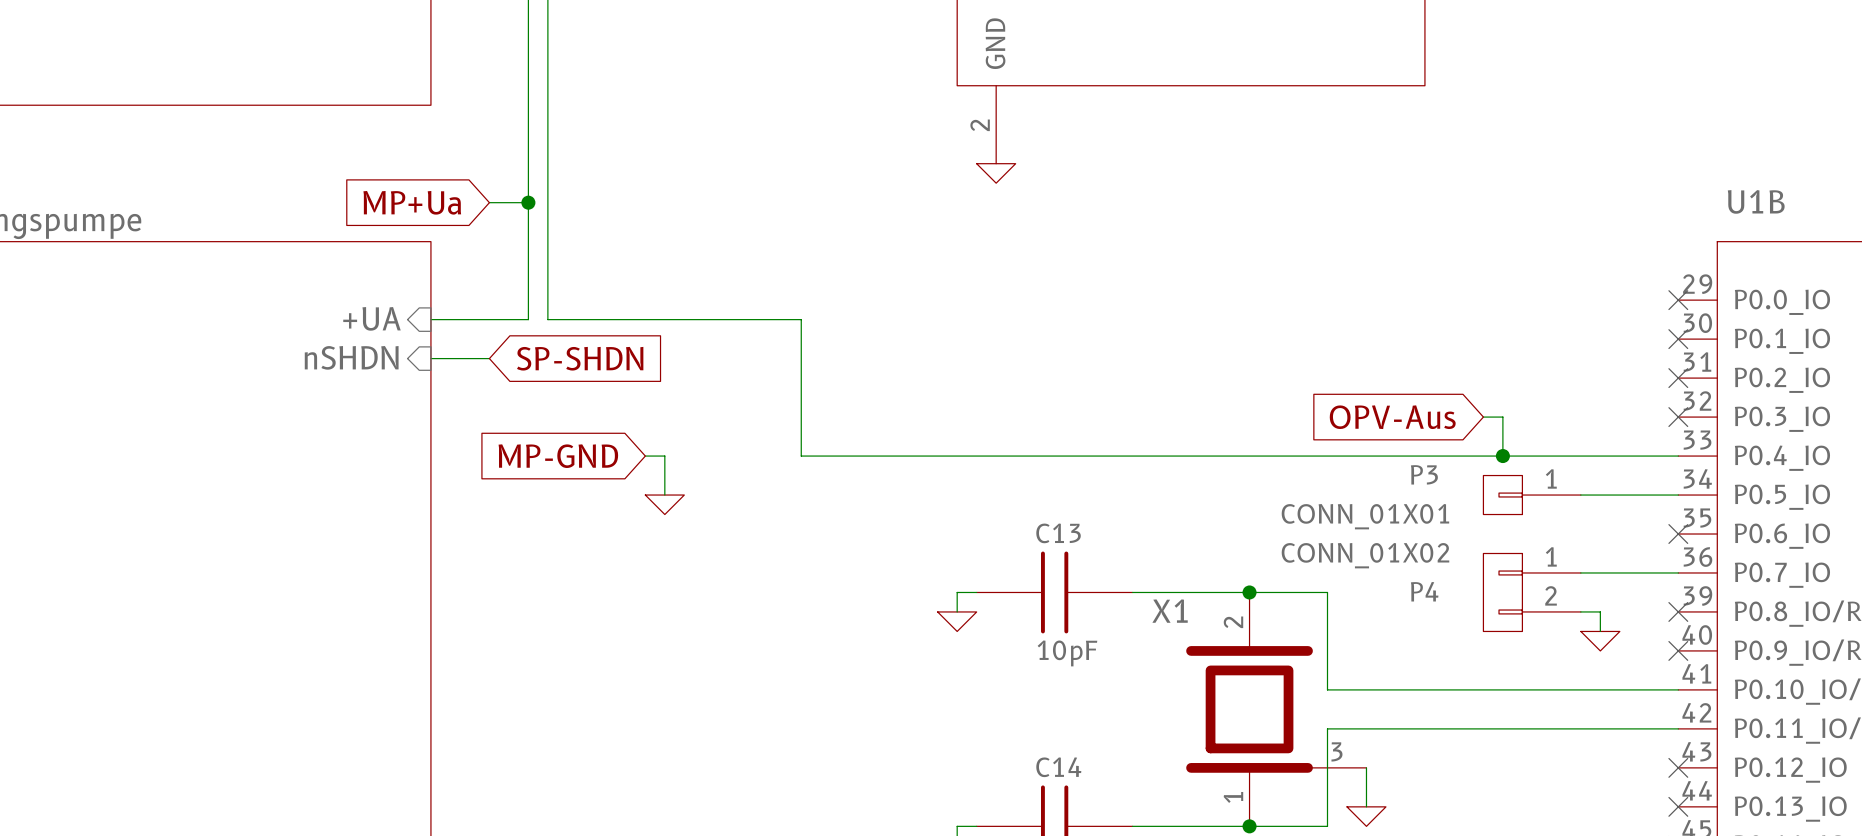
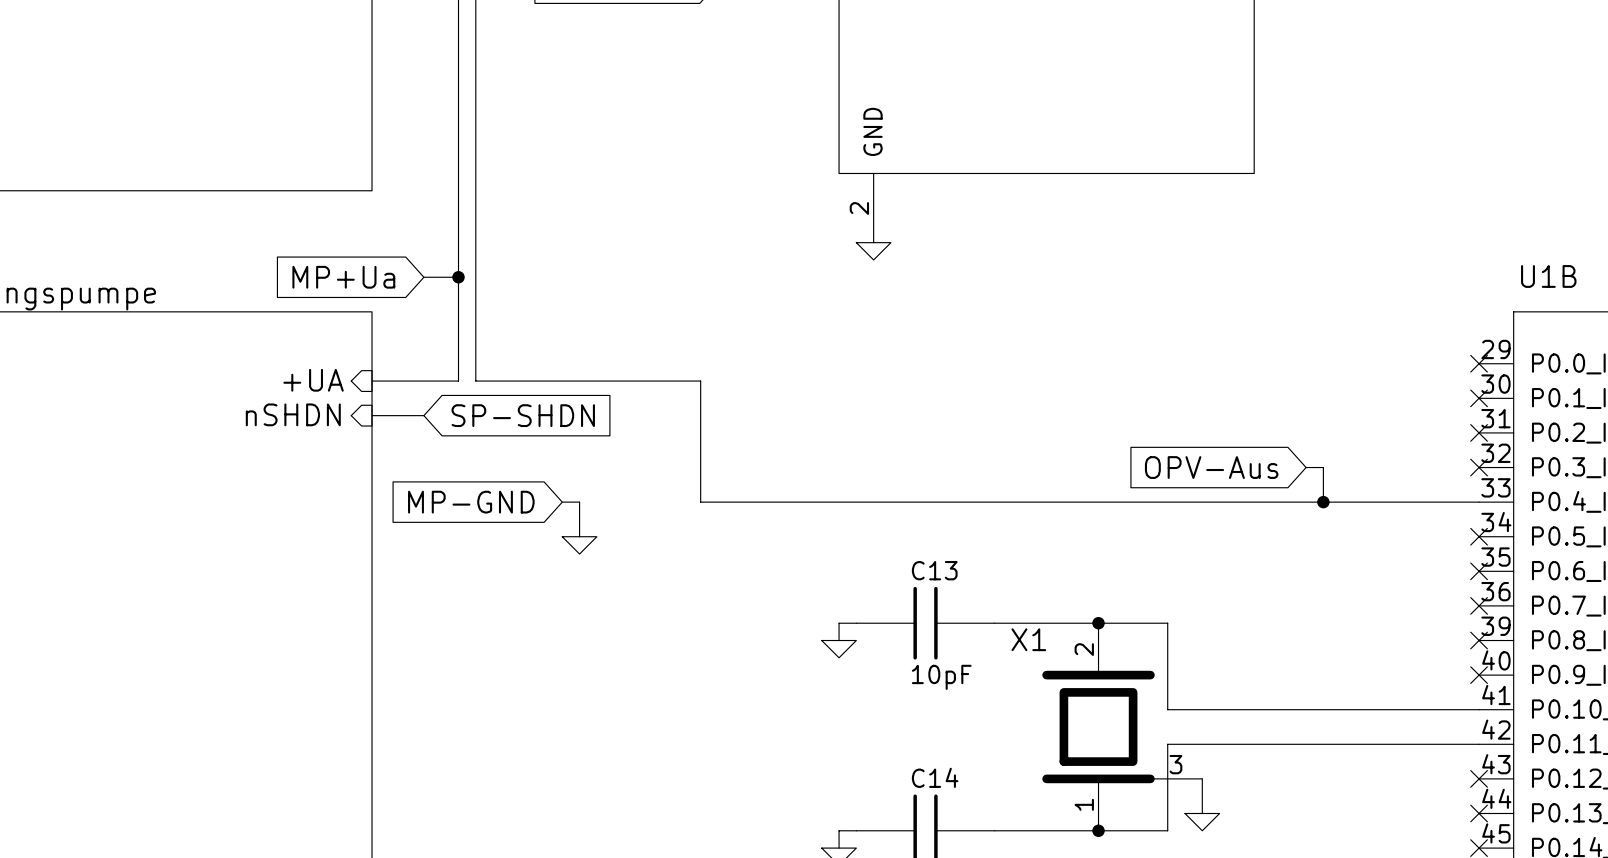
P3: CONN_01X01 (1532, 495) -> none
wire: (1580, 495) (1678, 495) -> none
no-connect mark: none -> (1479, 536)
wire: (1580, 572) (1678, 572) -> none
no-connect mark: none -> (1479, 605)
P4: CONN_01X02 (1532, 592) -> none
wire: (1580, 611) (1600, 611) (1600, 631) -> none
power symbol: (1600, 641) -> none

